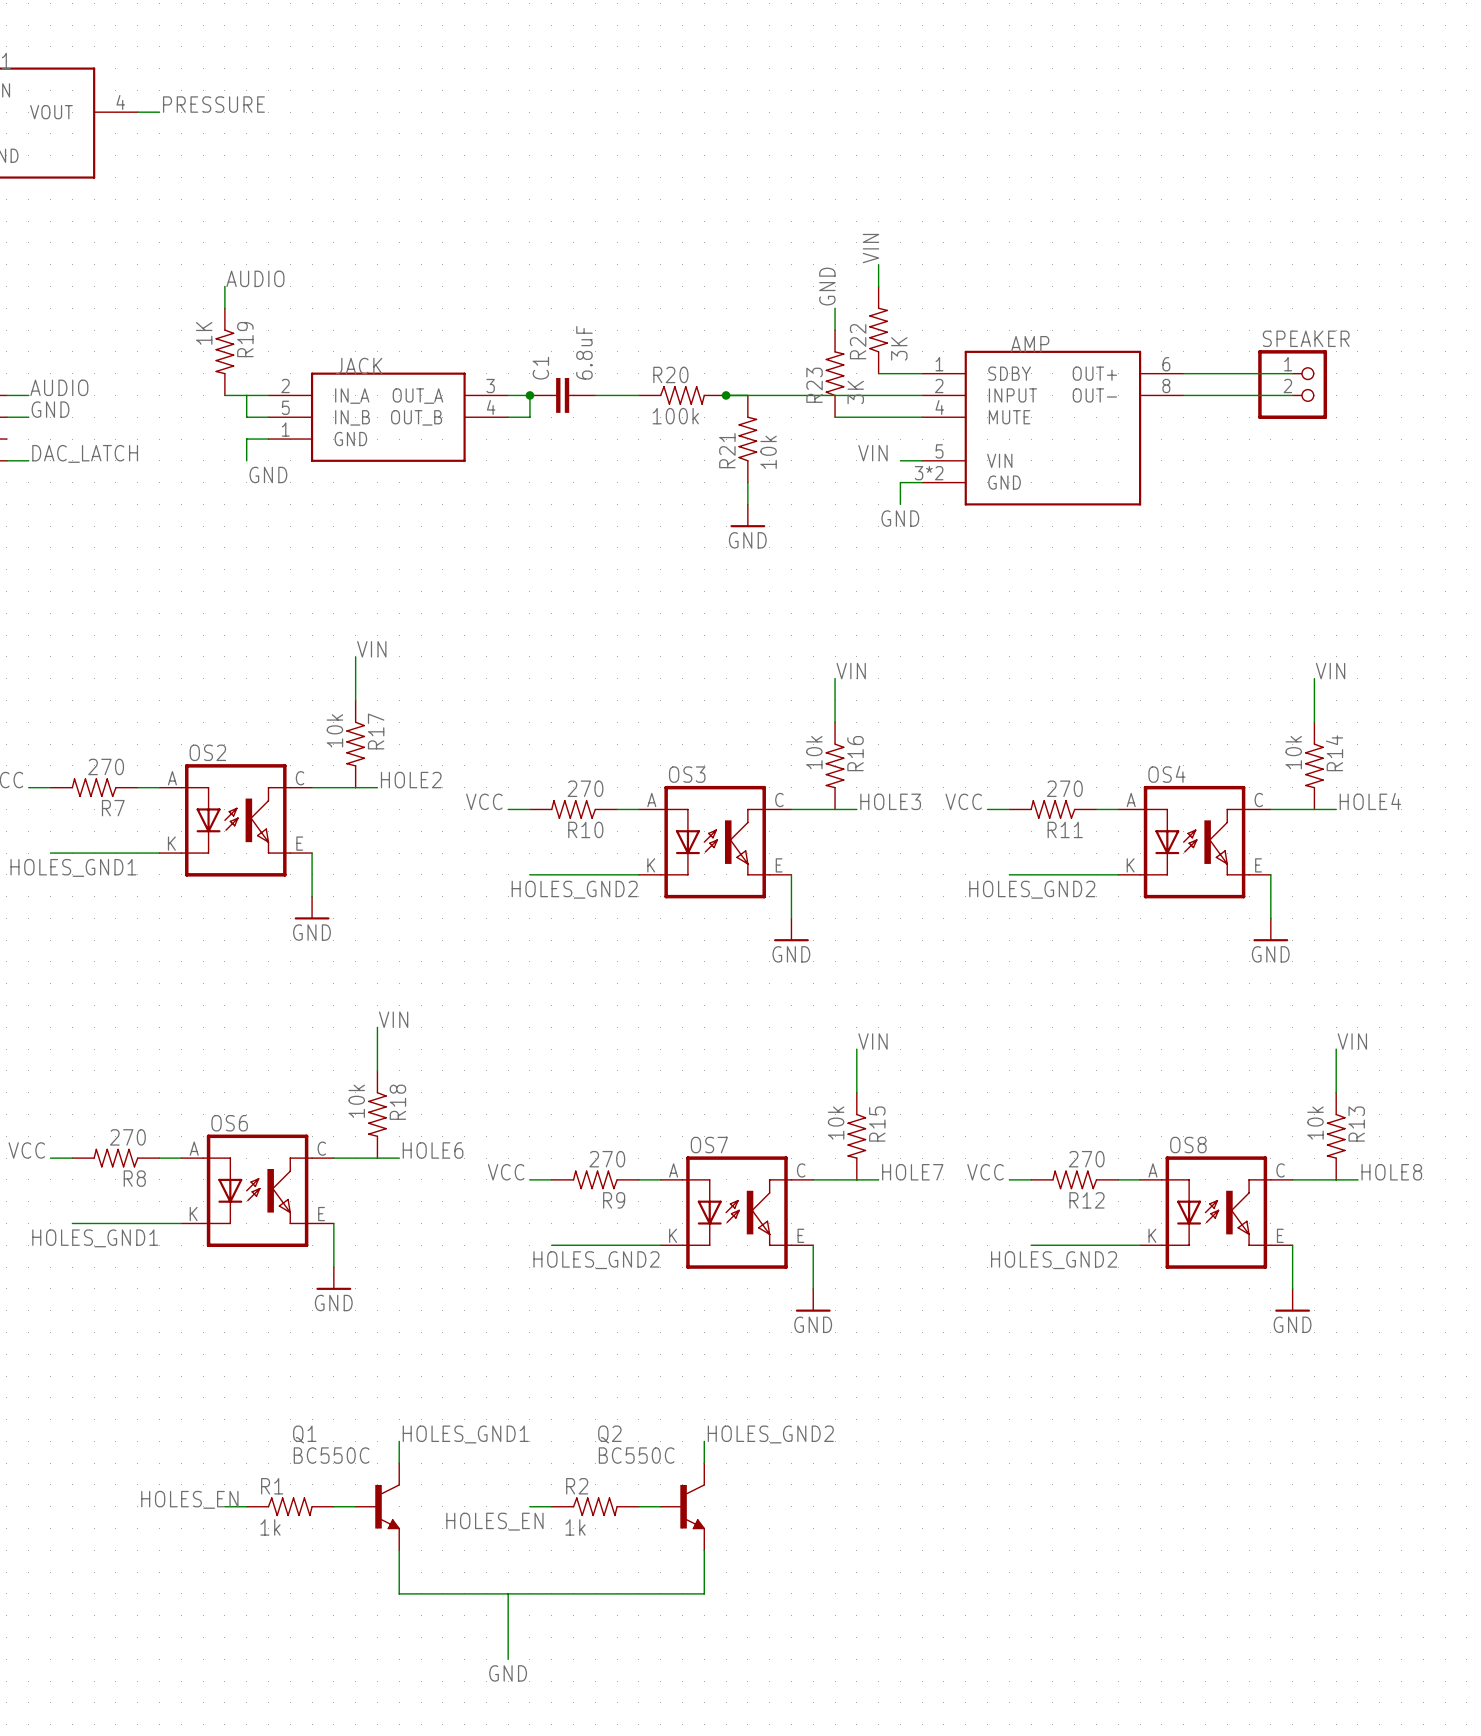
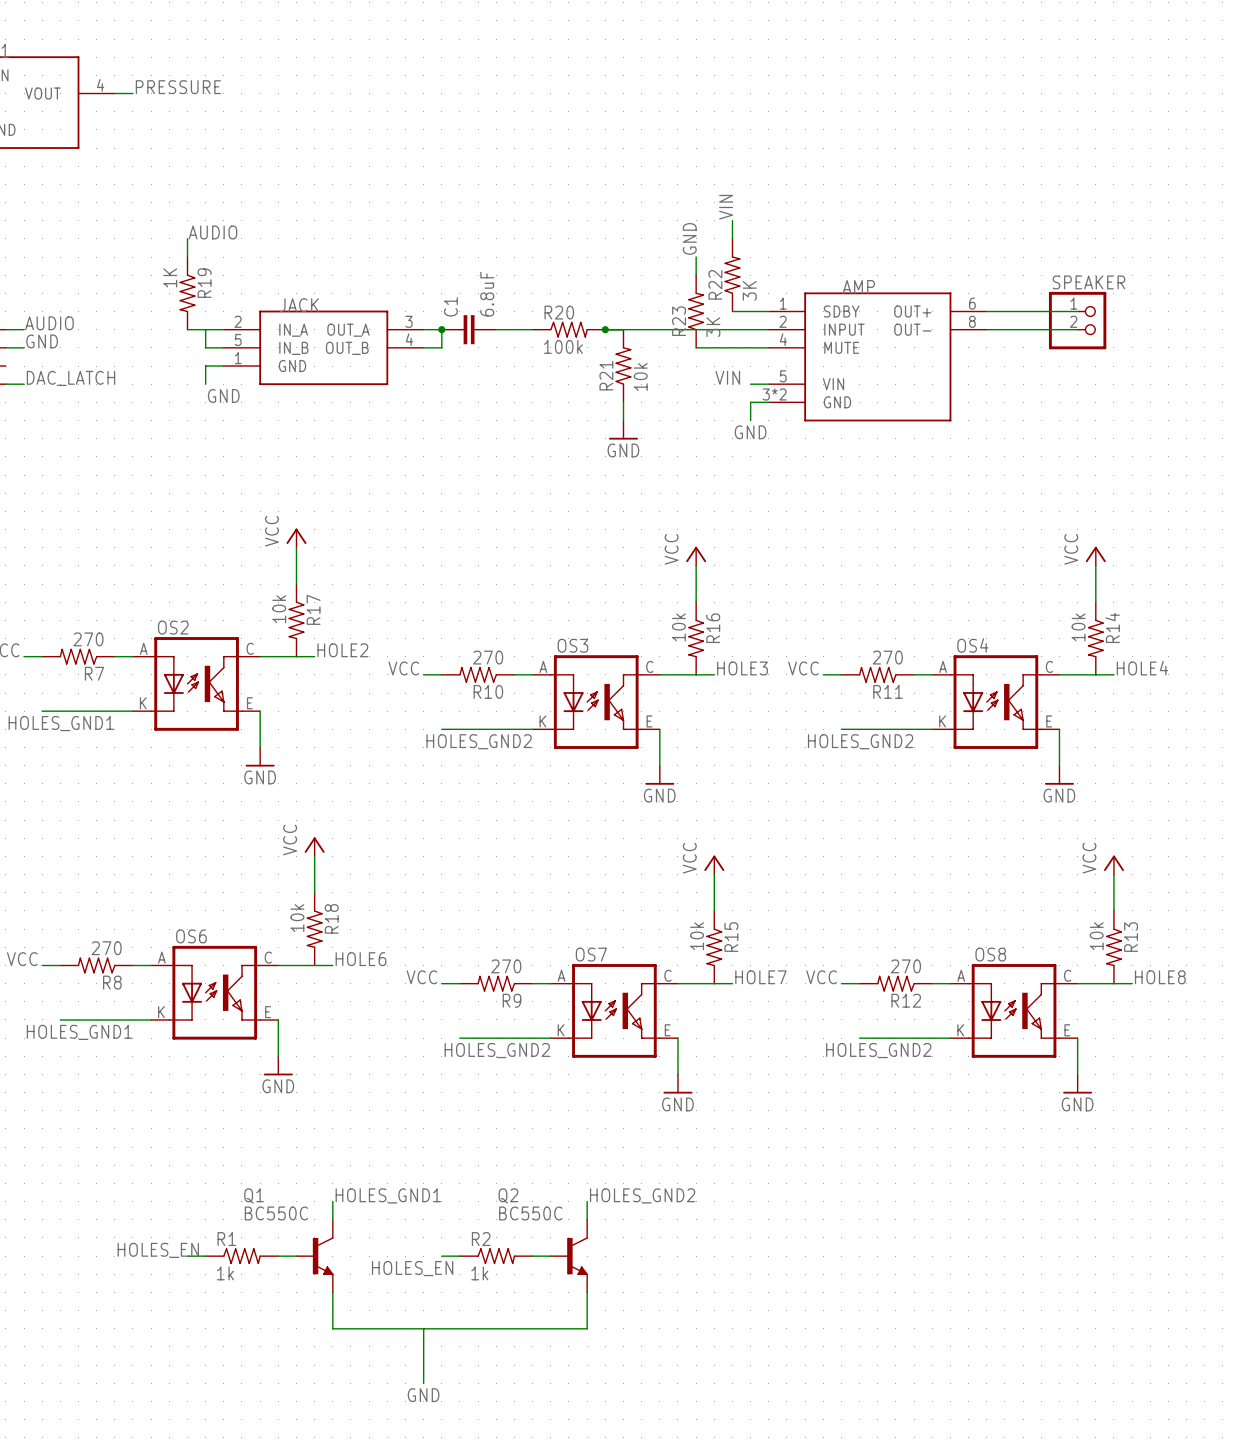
power symbol: none -> VCC (296, 538)
label: VIN (371, 649) -> none
power symbol: none -> VCC (696, 556)
power symbol: none -> VCC (1095, 556)
label: VIN (851, 671) -> none
label: VIN (1330, 671) -> none
power symbol: none -> VCC (314, 846)
label: VIN (393, 1019) -> none
power symbol: none -> VCC (714, 865)
power symbol: none -> VCC (1113, 865)
label: VIN (872, 1041) -> none
label: VIN (1352, 1041) -> none

